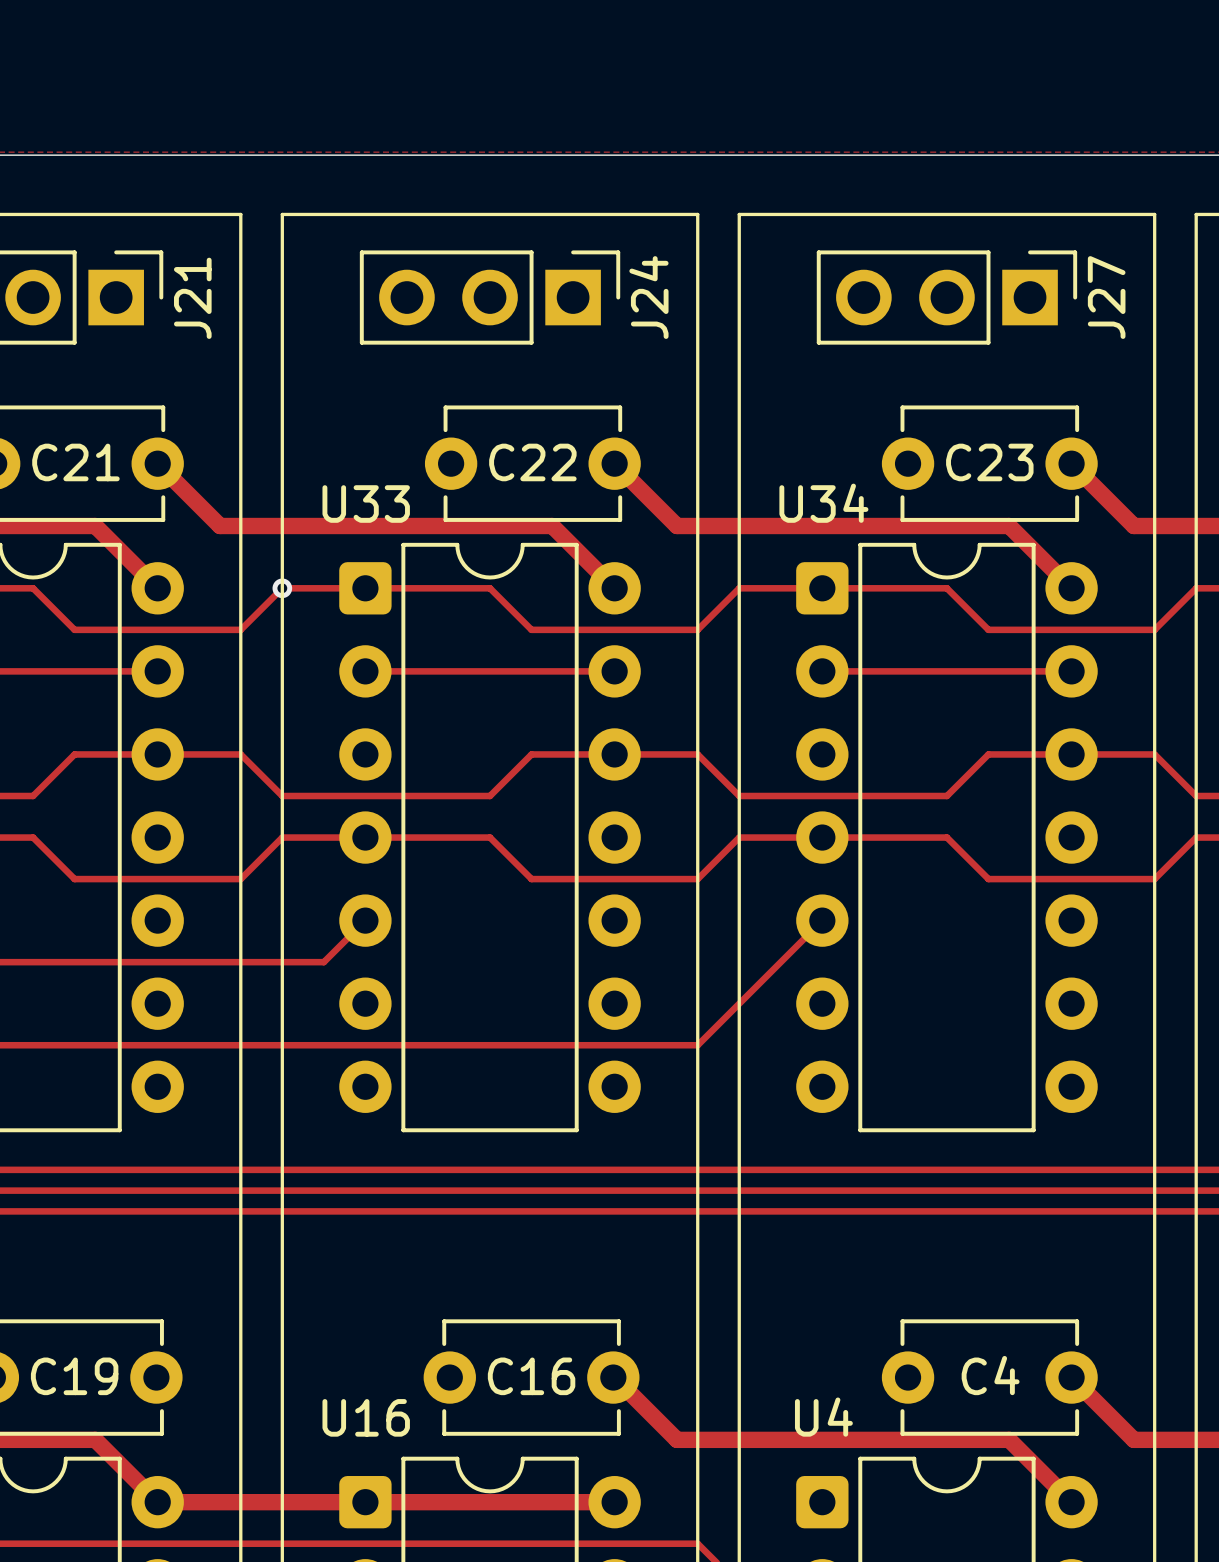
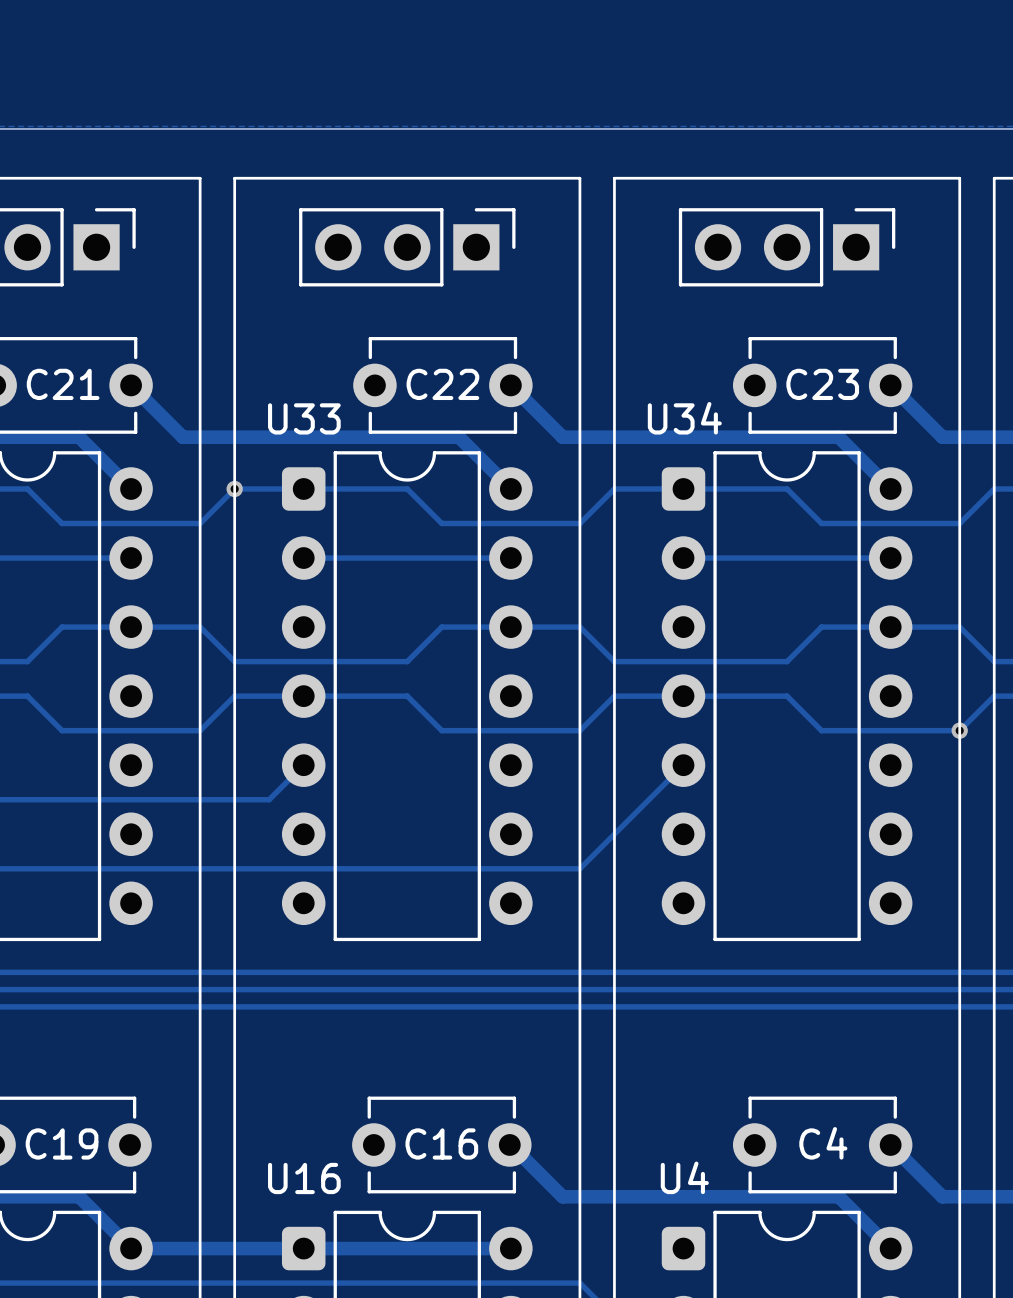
J24 name: J24 (648, 297) -> none
J27 name: J27 (1106, 297) -> none
J21 name: J21 (192, 298) -> none
via: none -> (959, 730)

